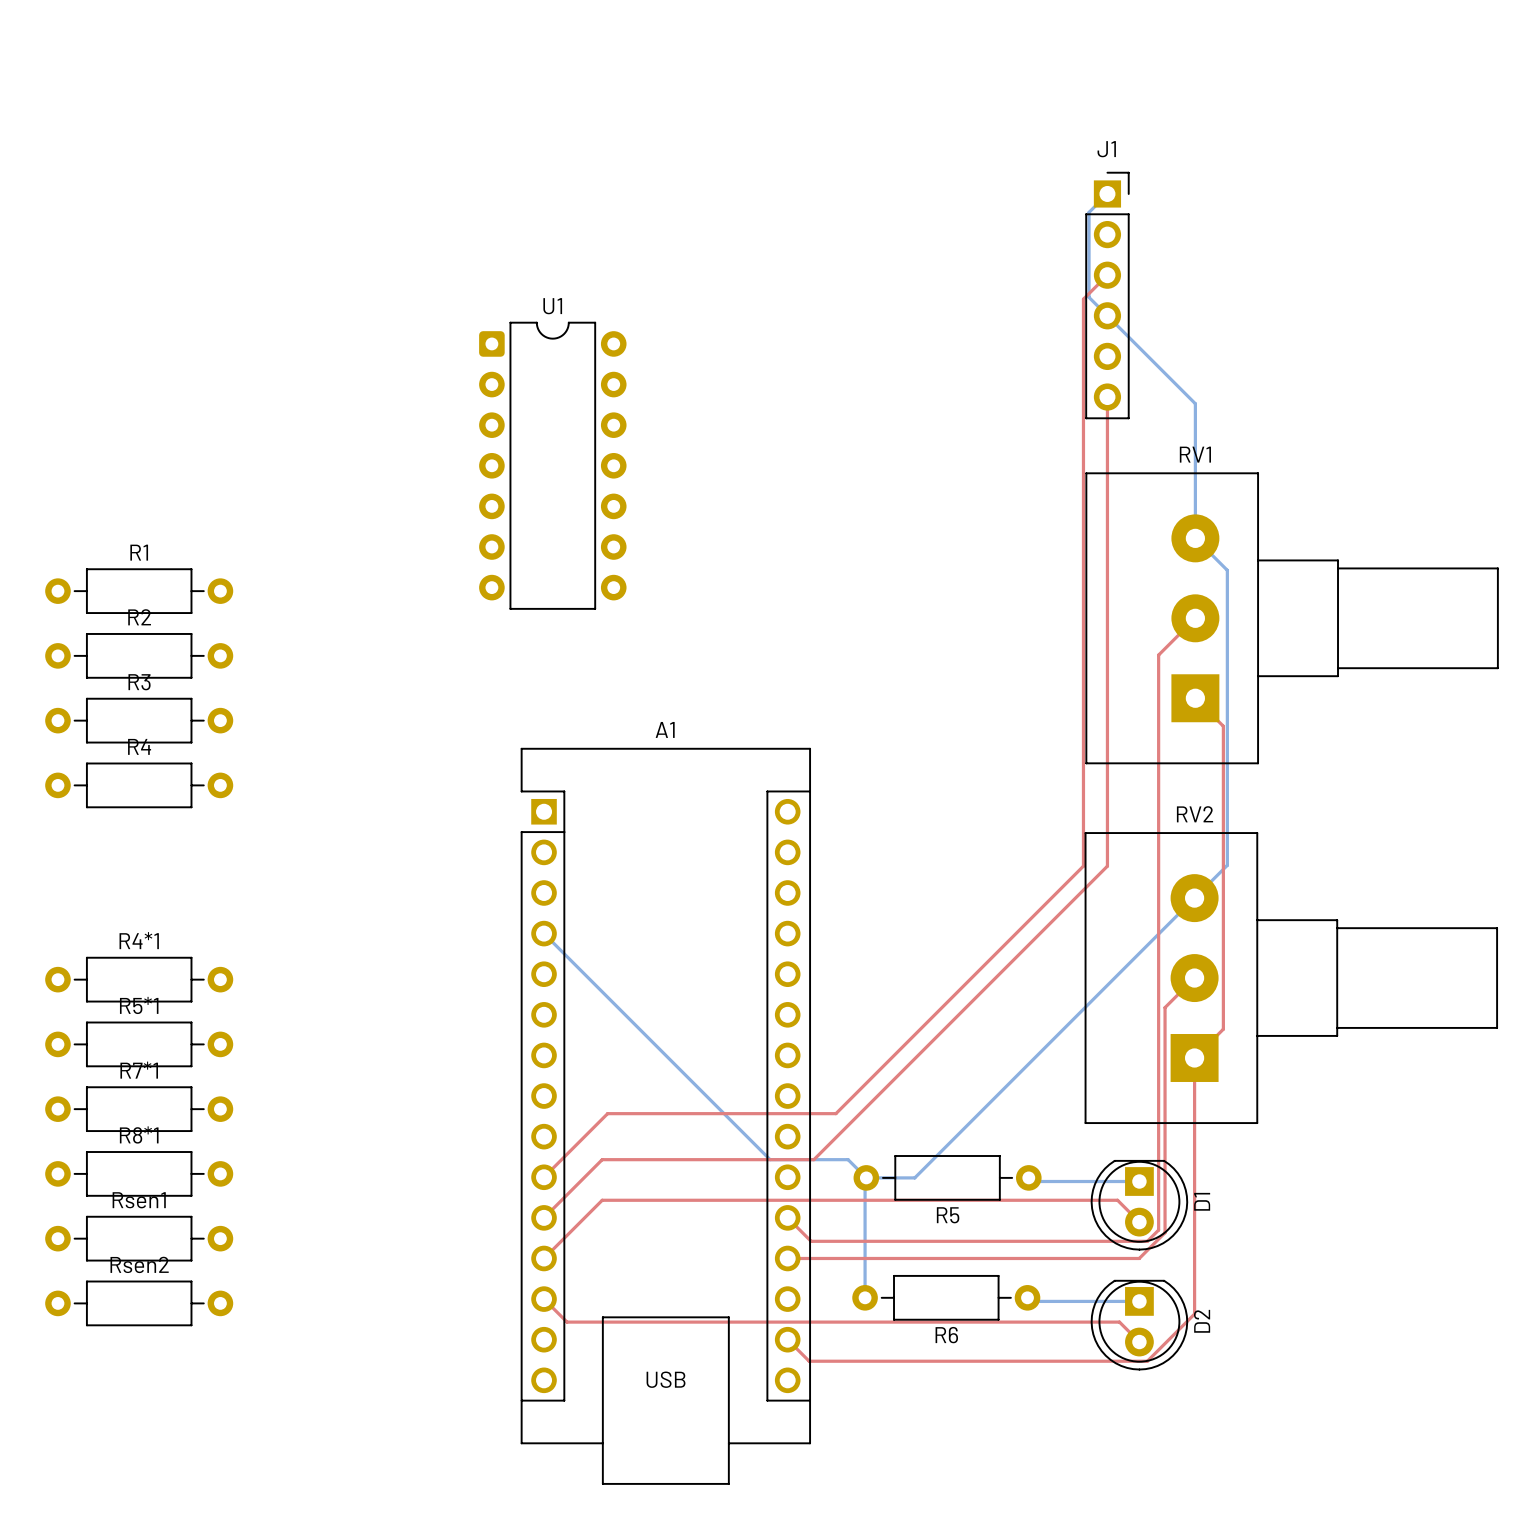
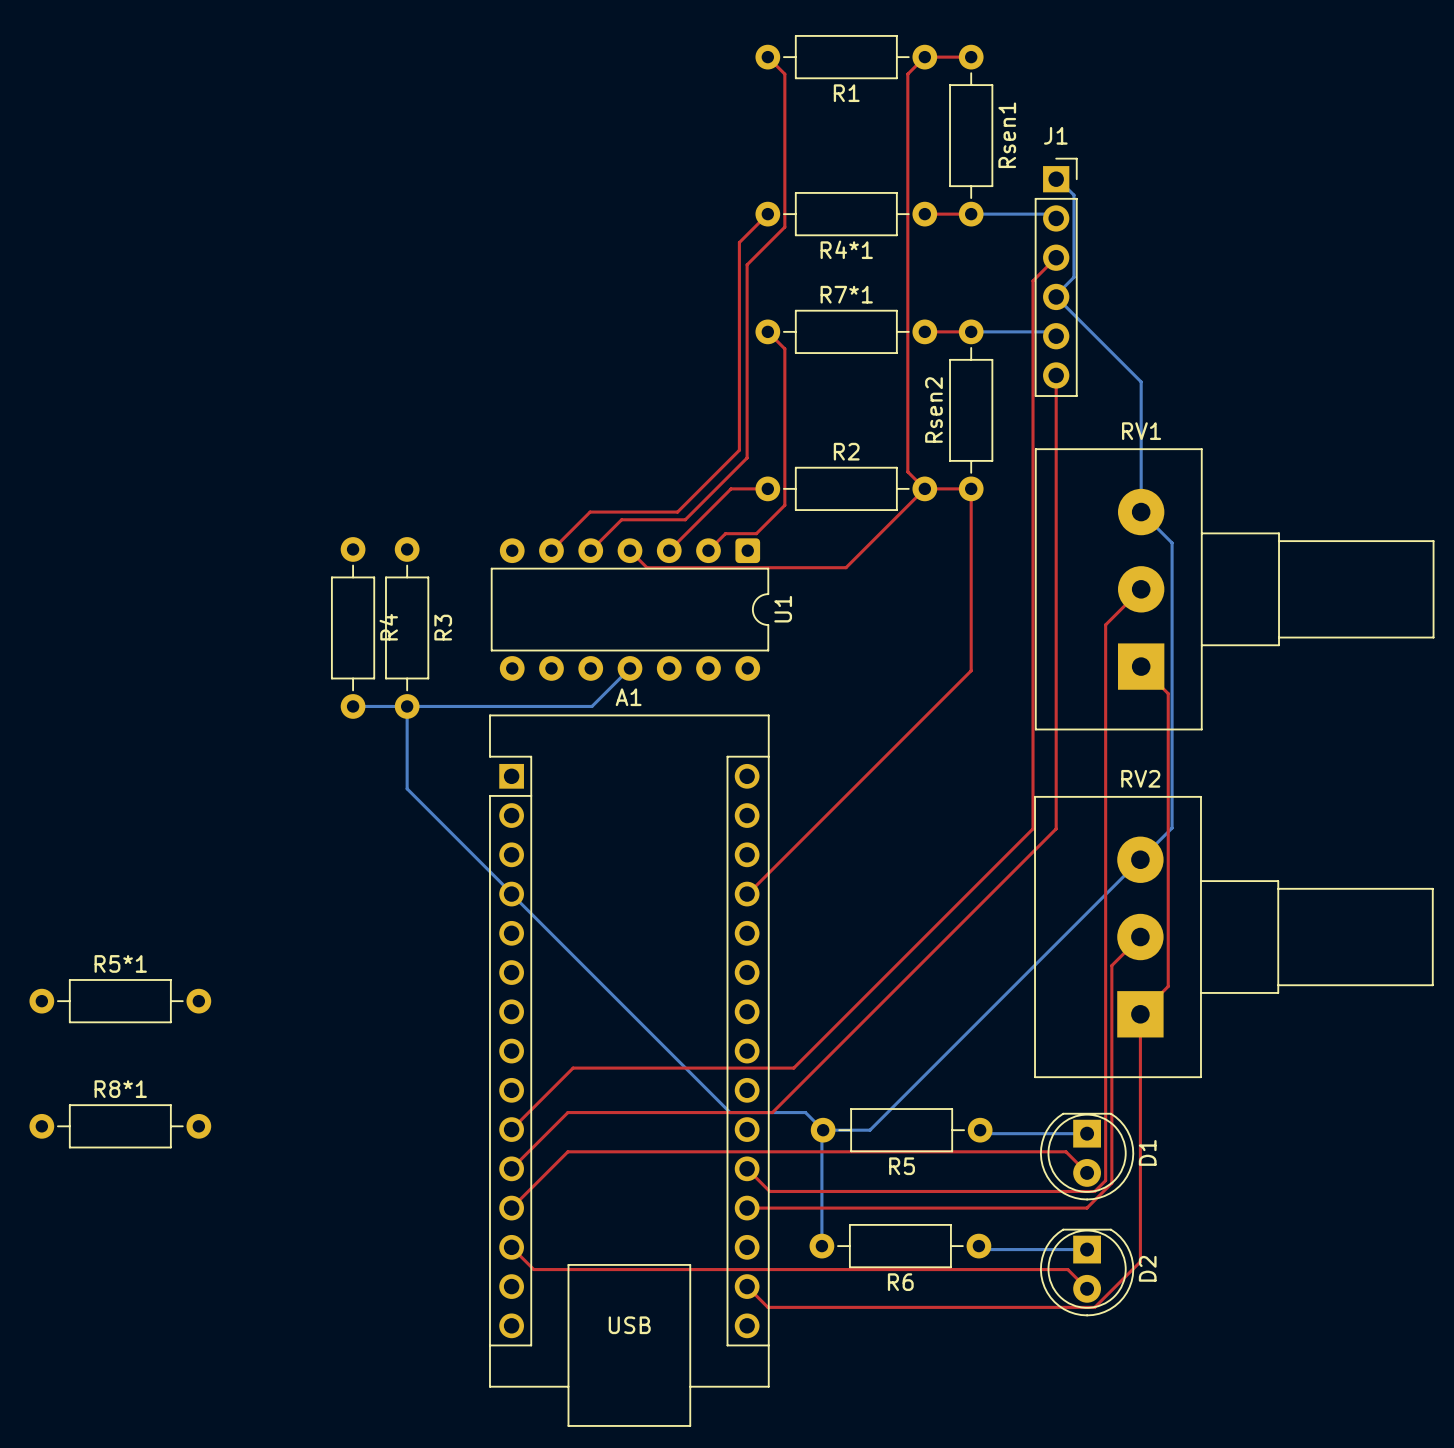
top track: none -> (767, 57) (784, 74) (784, 227) (747, 264) (747, 457) (685, 519) (621, 519) (590, 550)
top track: none -> (971, 57) (924, 57) (907, 74) (907, 471) (924, 488)
bottom track: none -> (1056, 177) (1073, 195) (1073, 277) (1056, 295)
bottom track: (1107, 193) (1089, 212) (1089, 297) (1107, 315) -> none
top track: none -> (767, 214) (739, 242) (739, 450) (677, 512) (590, 512) (551, 550)
top track: none -> (924, 214) (971, 214)
bottom track: none -> (971, 214) (1056, 214)
top track: none -> (767, 331) (784, 348) (784, 505) (756, 533) (725, 533) (708, 550)
top track: none -> (924, 331) (971, 331)
bottom track: none -> (971, 331) (1056, 331)
U1 rotation: 0° (552, 465) -> 90° clockwise (629, 609)
U1 position: (552, 465) -> (629, 609)
top track: none -> (767, 488) (731, 488) (669, 550)
top track: none -> (924, 488) (846, 567) (647, 567) (629, 550)
top track: none -> (924, 488) (971, 488) (971, 670) (747, 894)
R1 name position: R1 (139, 552) -> R1 (846, 93)
R1 position: (139, 591) -> (846, 57)
R2 position: (139, 655) -> (846, 488)
bottom track: none -> (629, 668) (591, 706) (353, 706)
R3 rotation: 0° (139, 720) -> 90° clockwise (407, 627)
R3 position: (139, 720) -> (407, 627)
bottom track: none -> (407, 706) (407, 788) (512, 894)
R4 rotation: 0° (139, 785) -> 90° clockwise (353, 627)
R4 position: (139, 785) -> (353, 627)
R4*1 name position: R4*1 (139, 940) -> R4*1 (846, 249)
R4*1 position: (139, 979) -> (846, 214)
R7*1 position: (139, 1109) -> (846, 331)
Rsen1 rotation: 0° (139, 1238) -> 90° clockwise (971, 135)
Rsen1 position: (139, 1238) -> (971, 135)
Rsen2 name position: Rsen2 (139, 1264) -> Rsen2 (933, 410)
Rsen2 rotation: 0° (139, 1303) -> 90° clockwise (971, 410)
Rsen2 position: (139, 1303) -> (971, 410)

